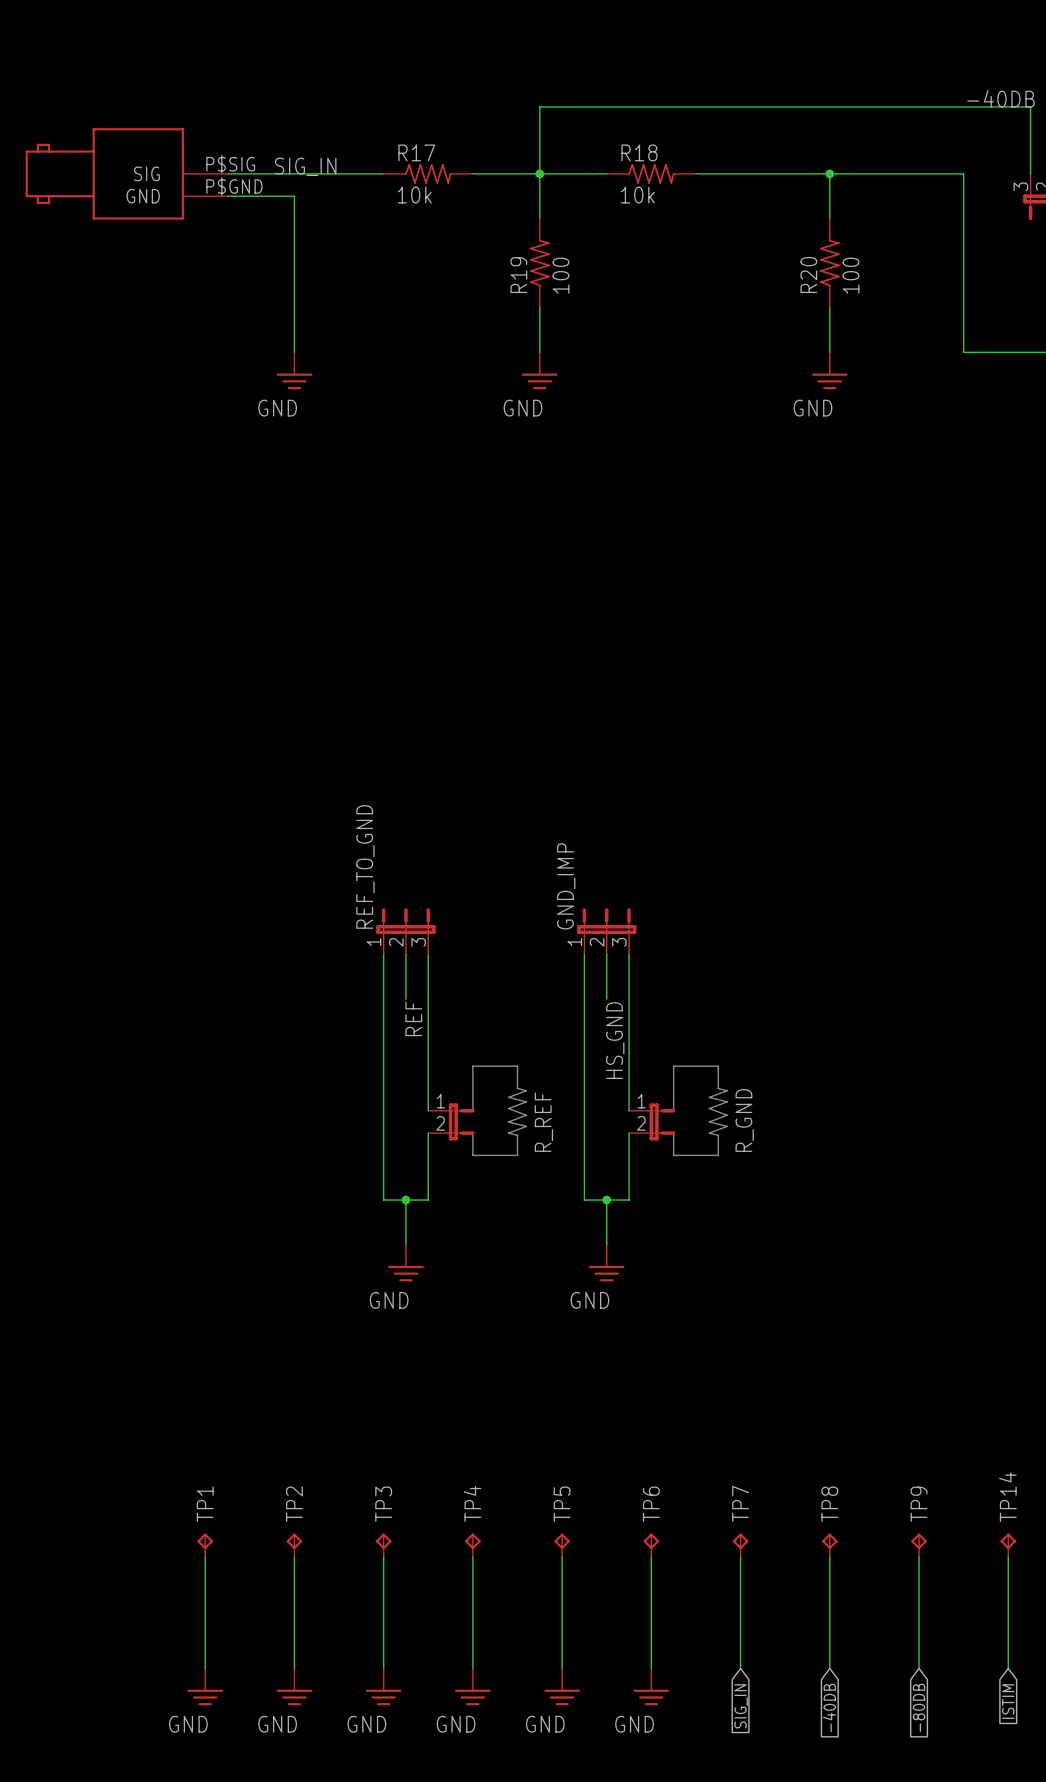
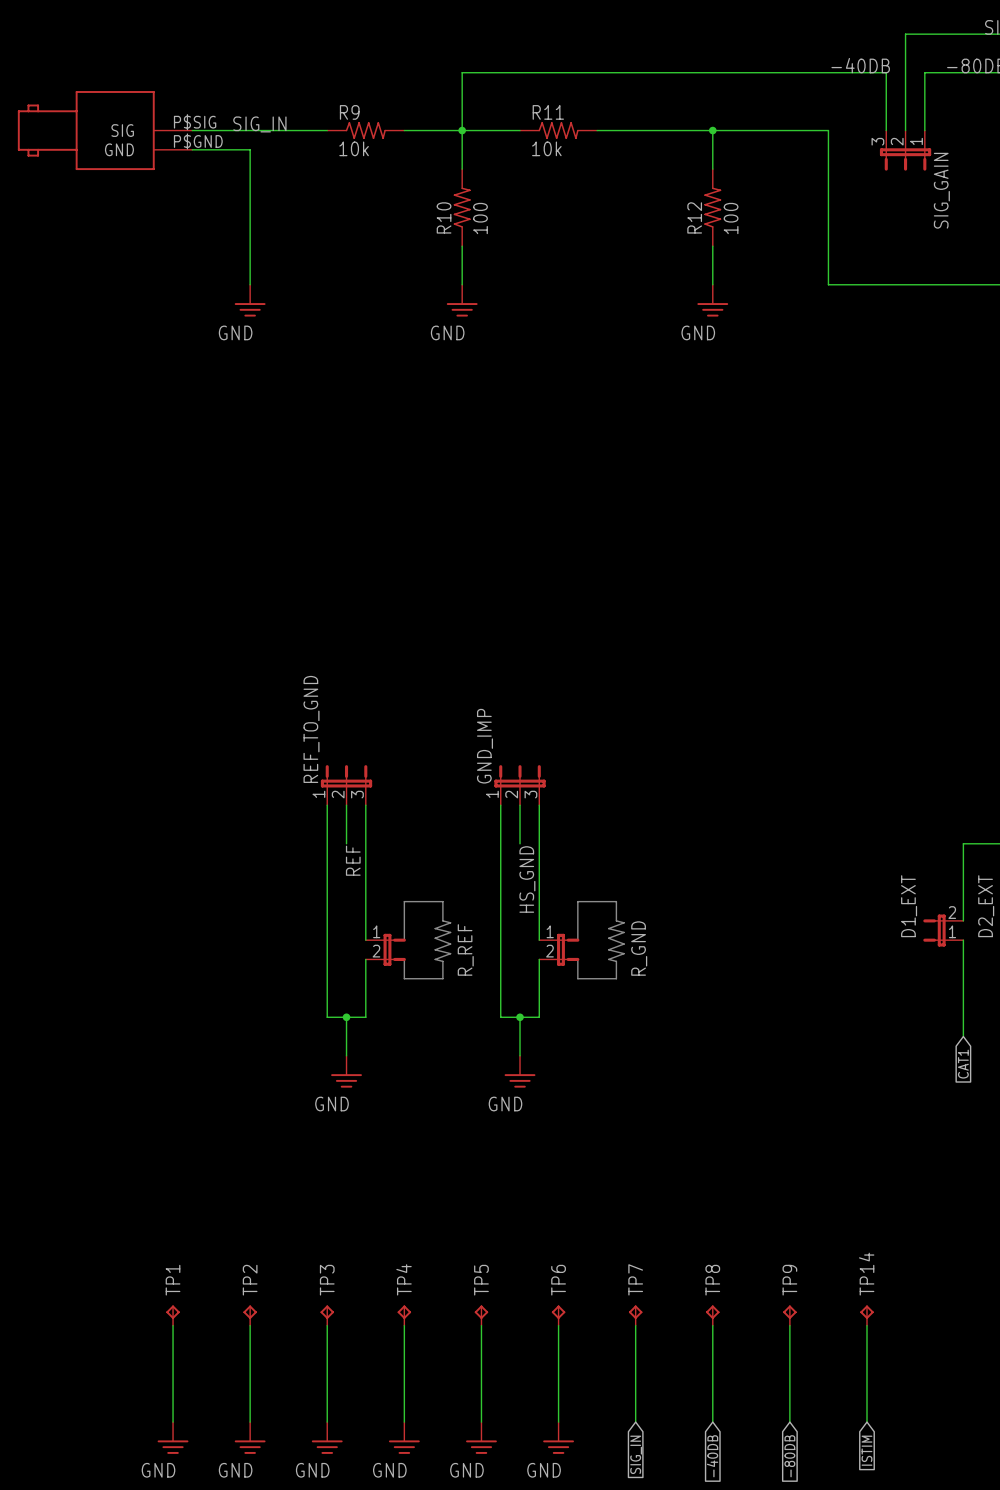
R17 name: R17 (416, 152) -> R9 (349, 112)
R18 name: R18 (639, 152) -> R11 (548, 112)
R19 name: R19 (518, 275) -> R10 (444, 217)
R20 name: R20 (808, 275) -> R12 (694, 217)

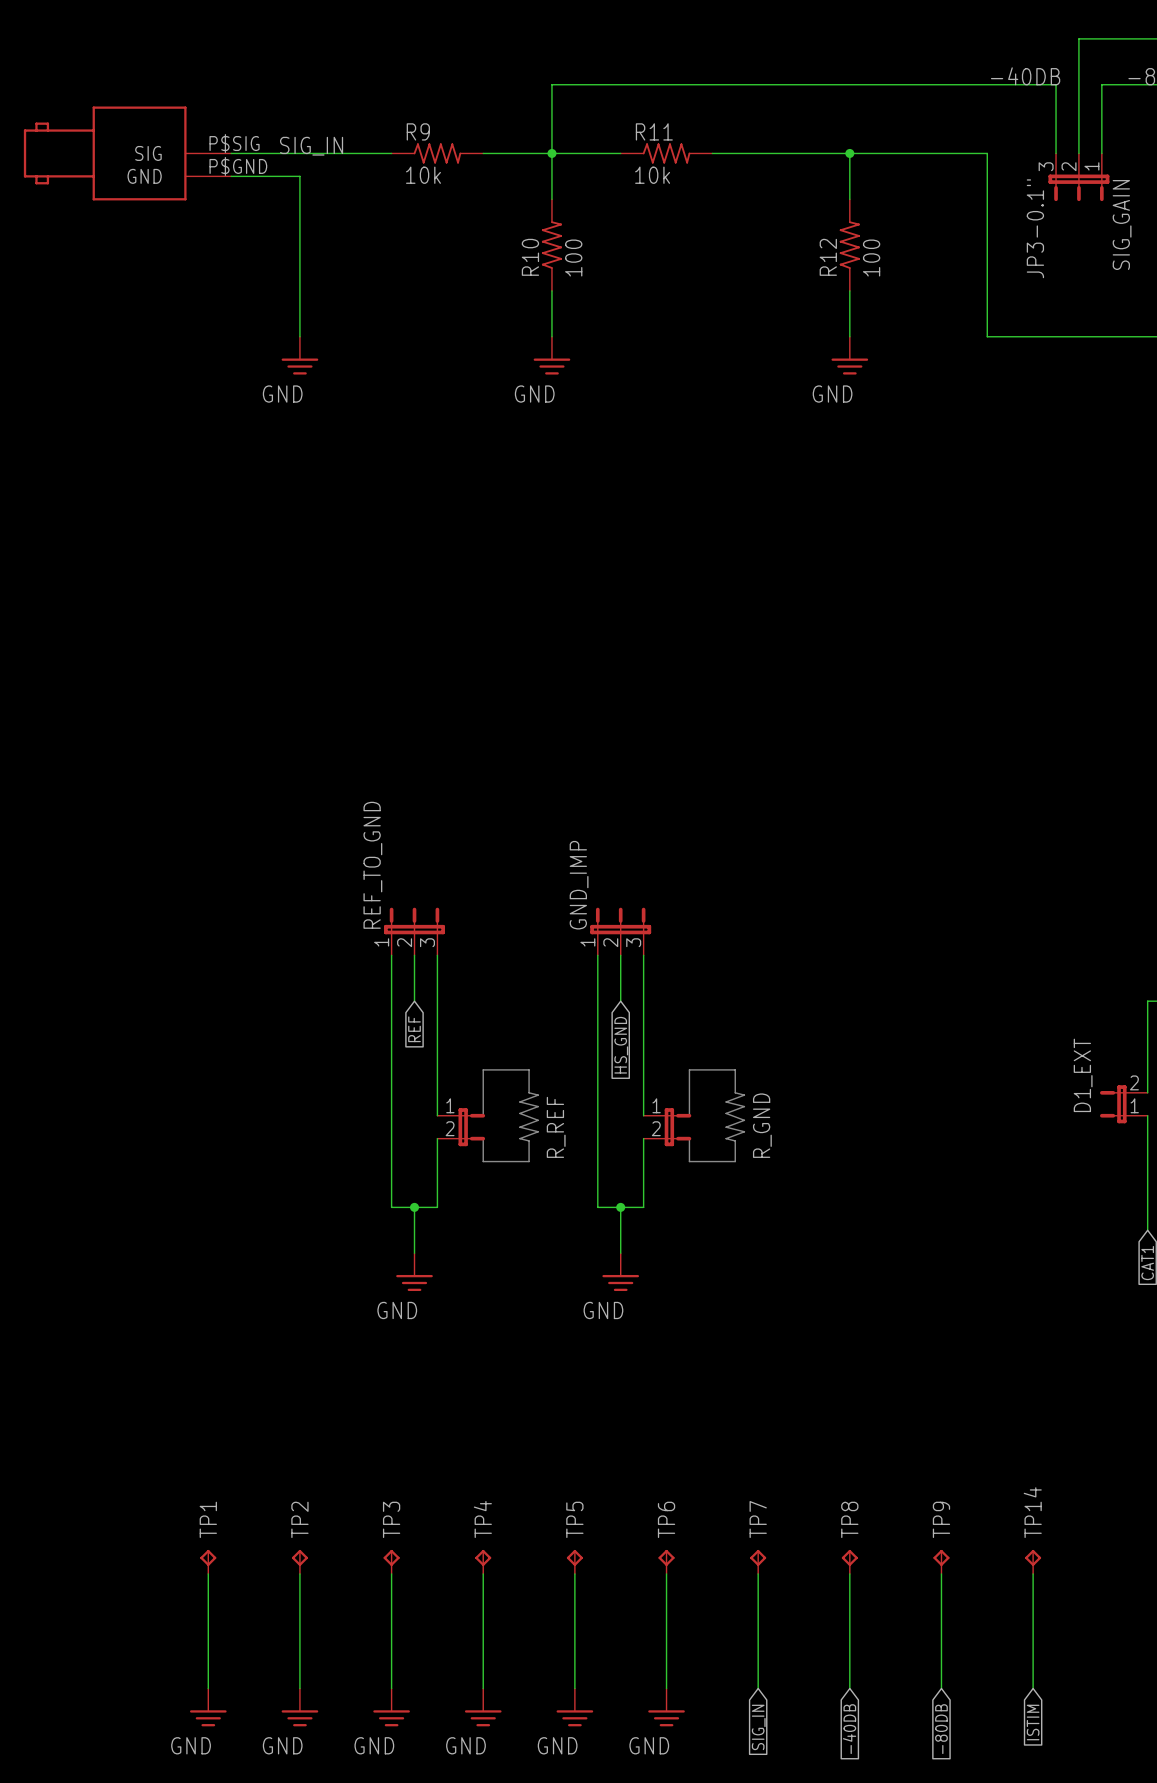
SIG_GAIN value: none -> JP3-0.1" (1035, 228)
label: REF (353, 860) -> none
global label: none -> REF (414, 1029)
label: HS_GND (527, 879) -> none
global label: none -> HS_GND (621, 1045)

